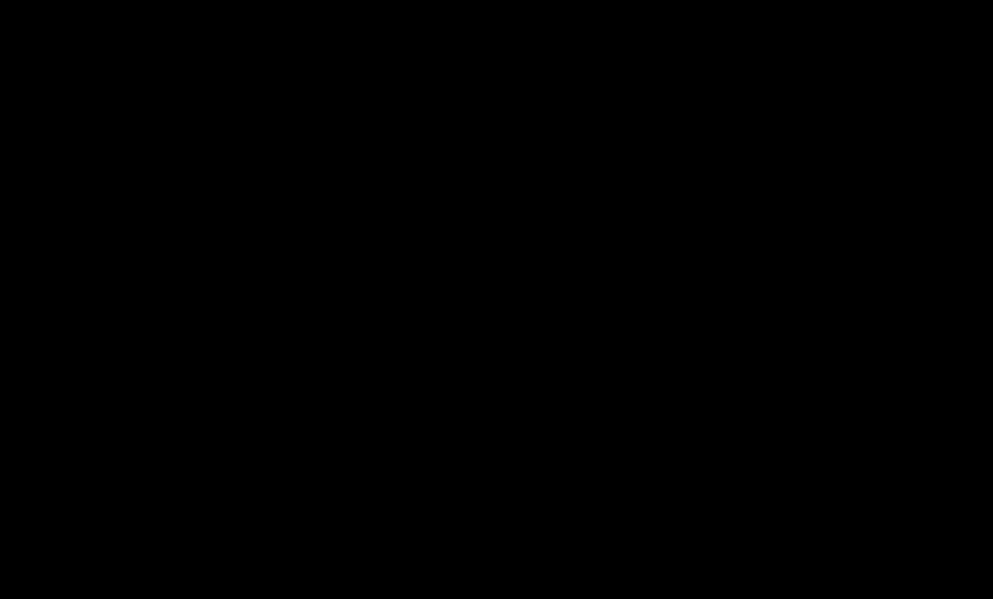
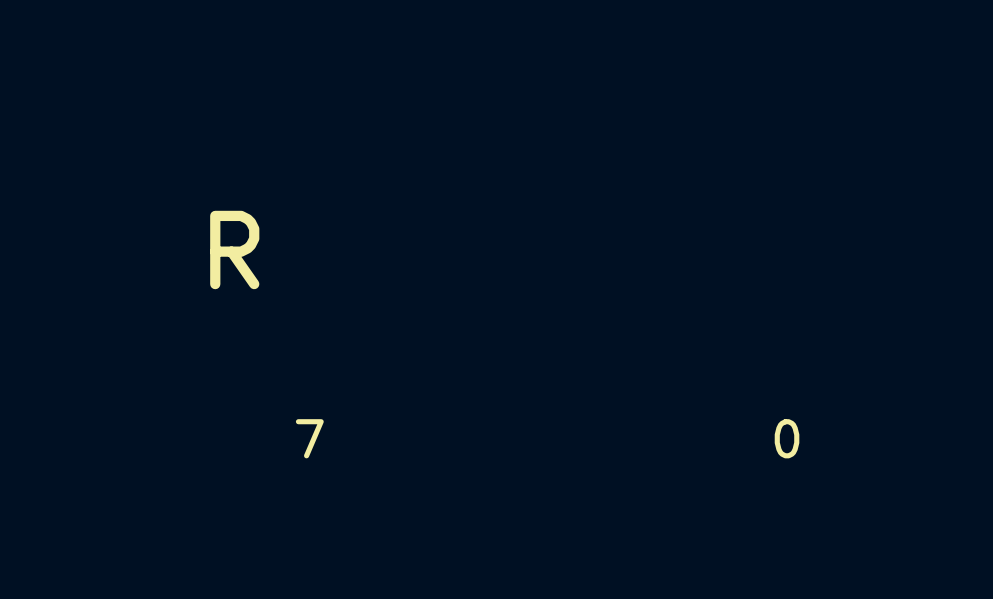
text: none -> R (234, 250)
text: none -> 7 (309, 438)
text: none -> 0 (787, 438)

